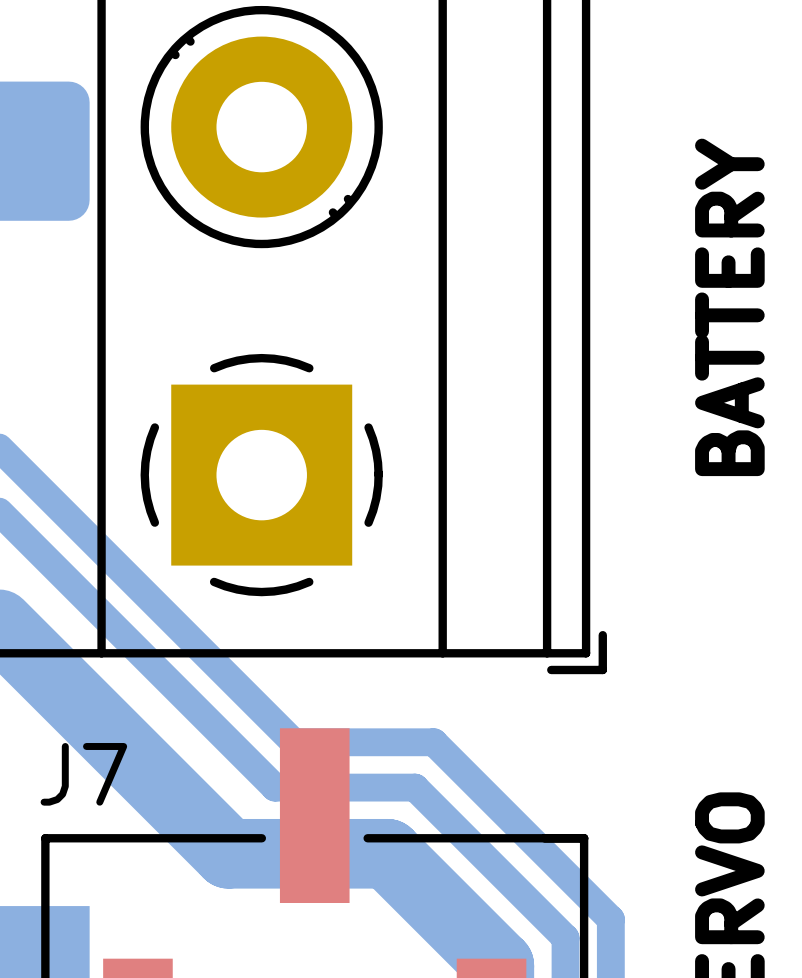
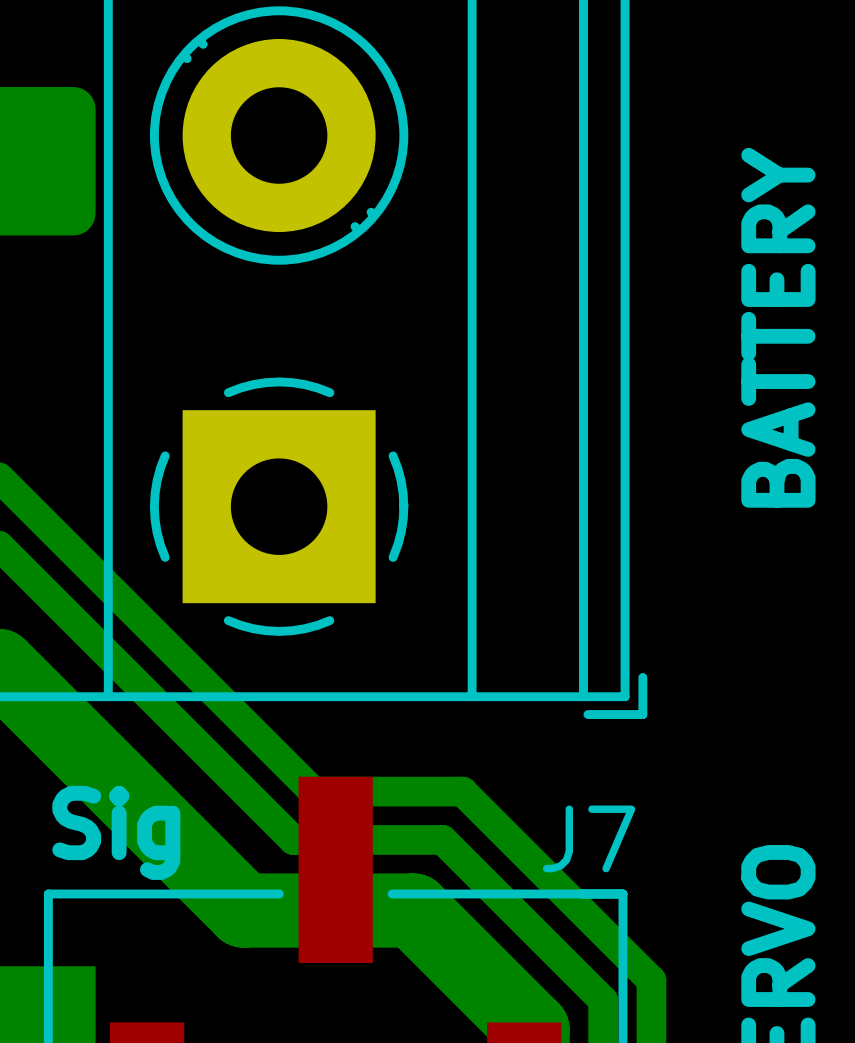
J7 name position: J7 (83, 774) -> J7 (589, 838)
text: none -> Sig (116, 832)

